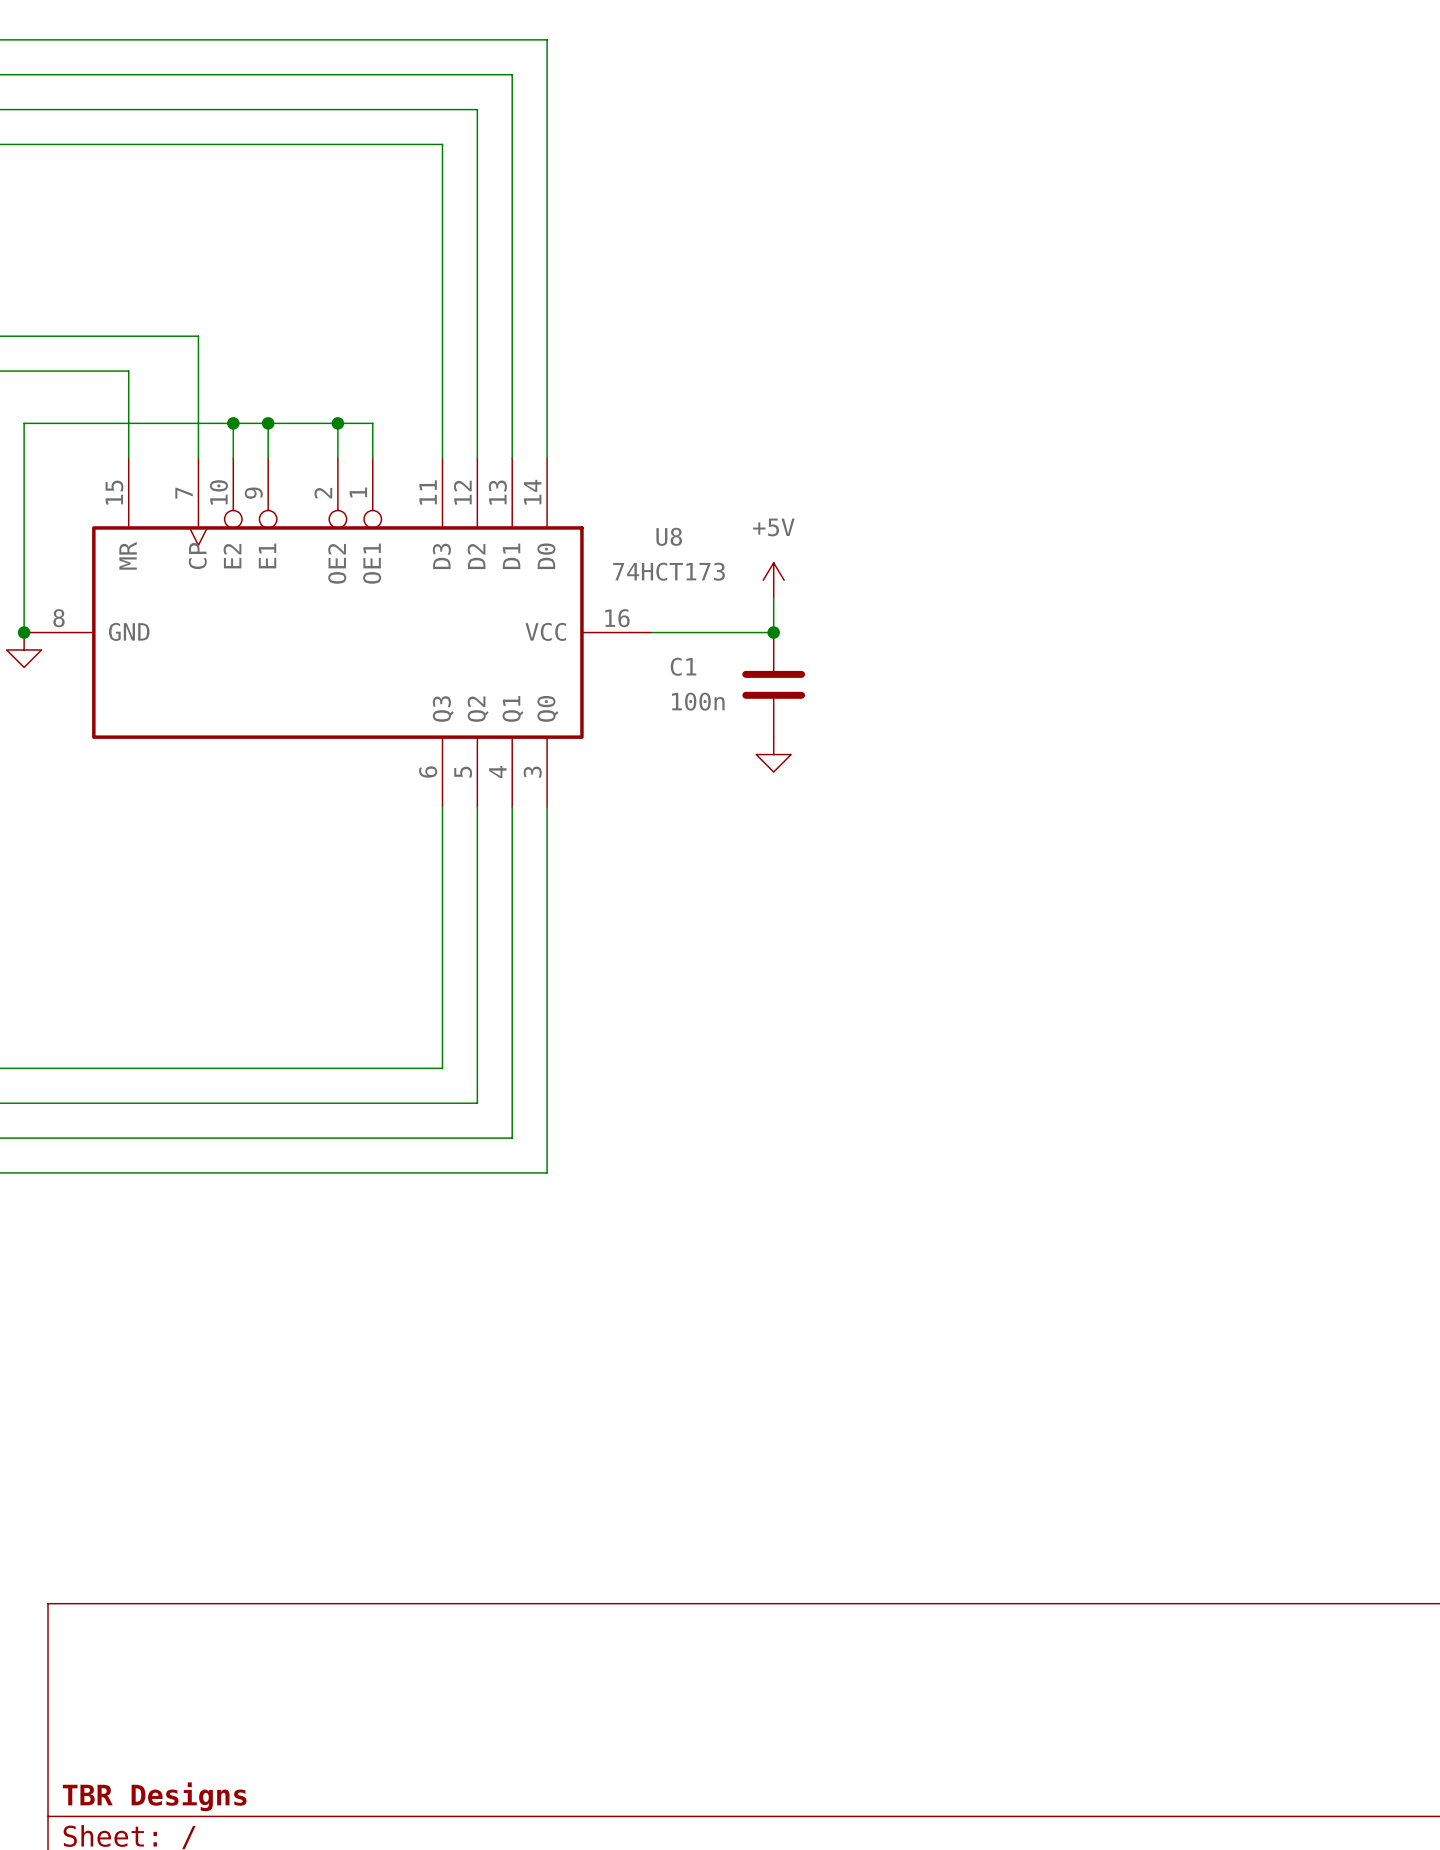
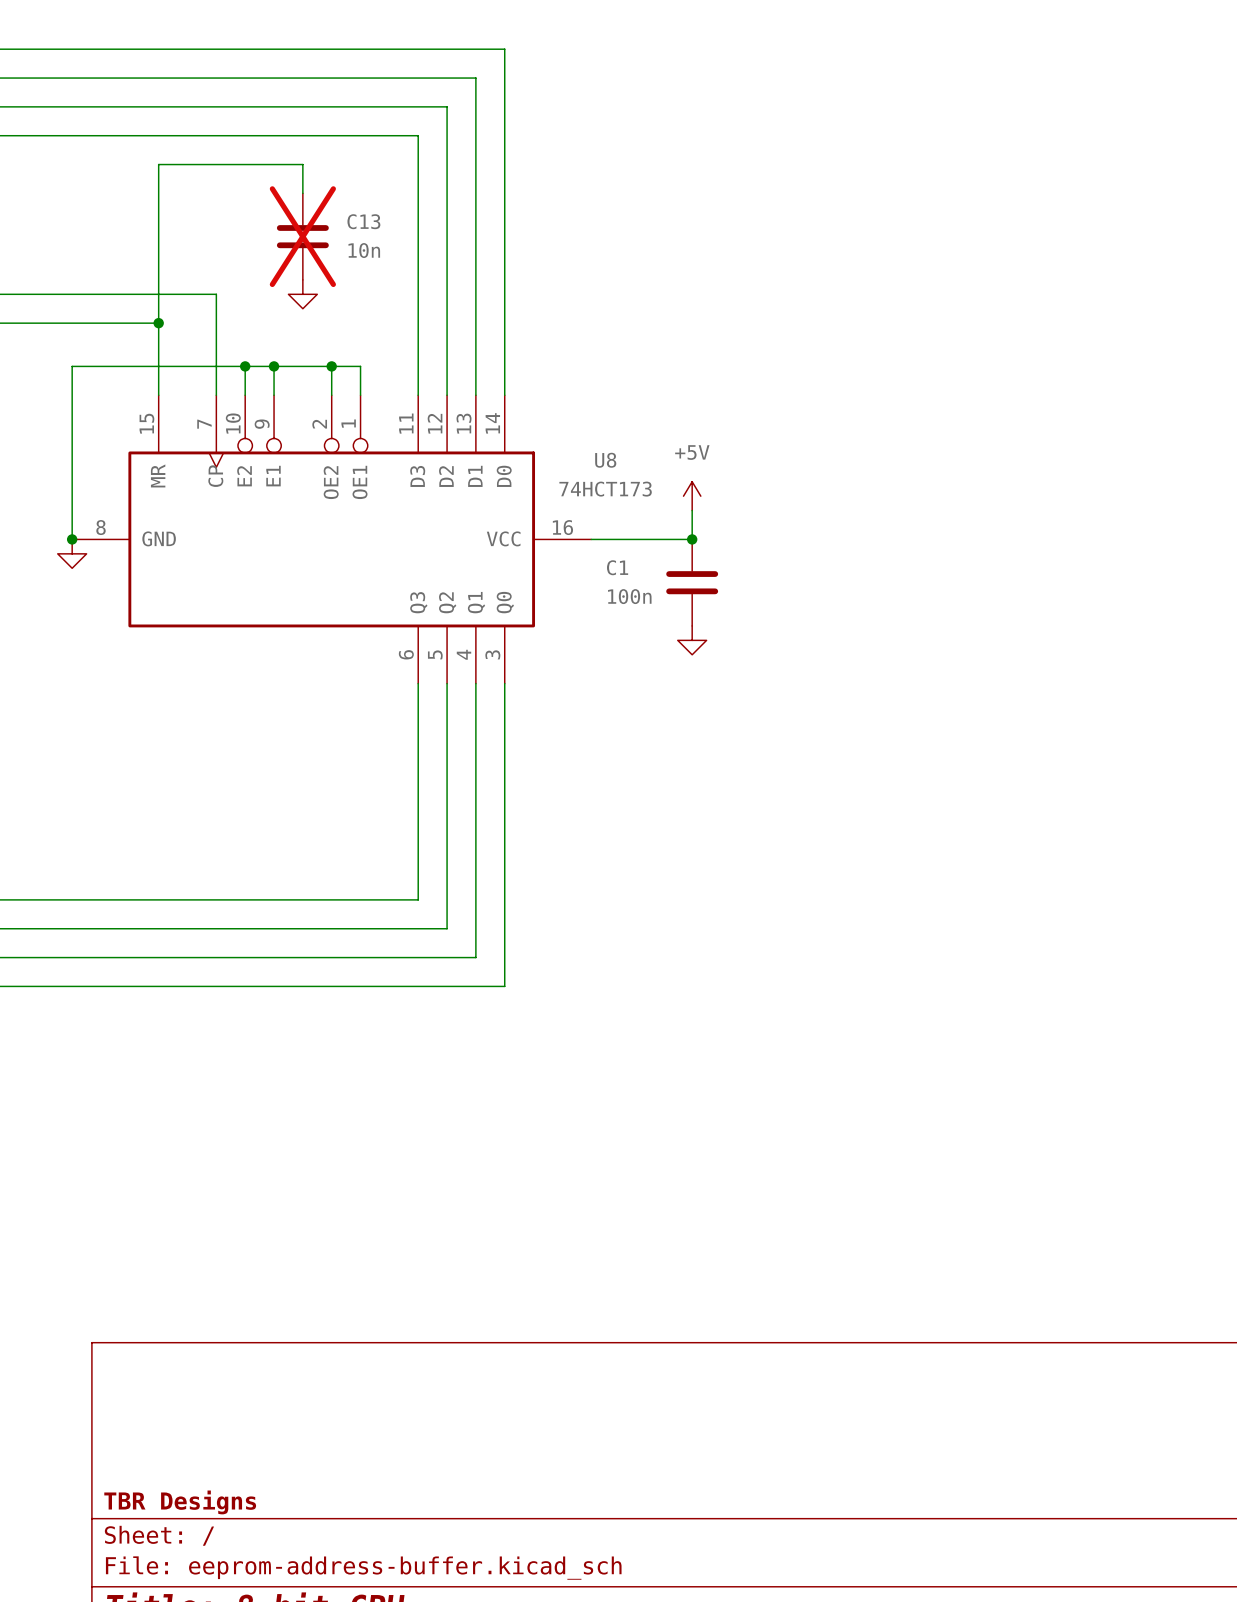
wire: none -> (302, 193) (302, 164) (158, 164) (158, 323)
C13: none -> 10n (302, 236)
power symbol: none -> (302, 294)
junction: none -> (158, 323)

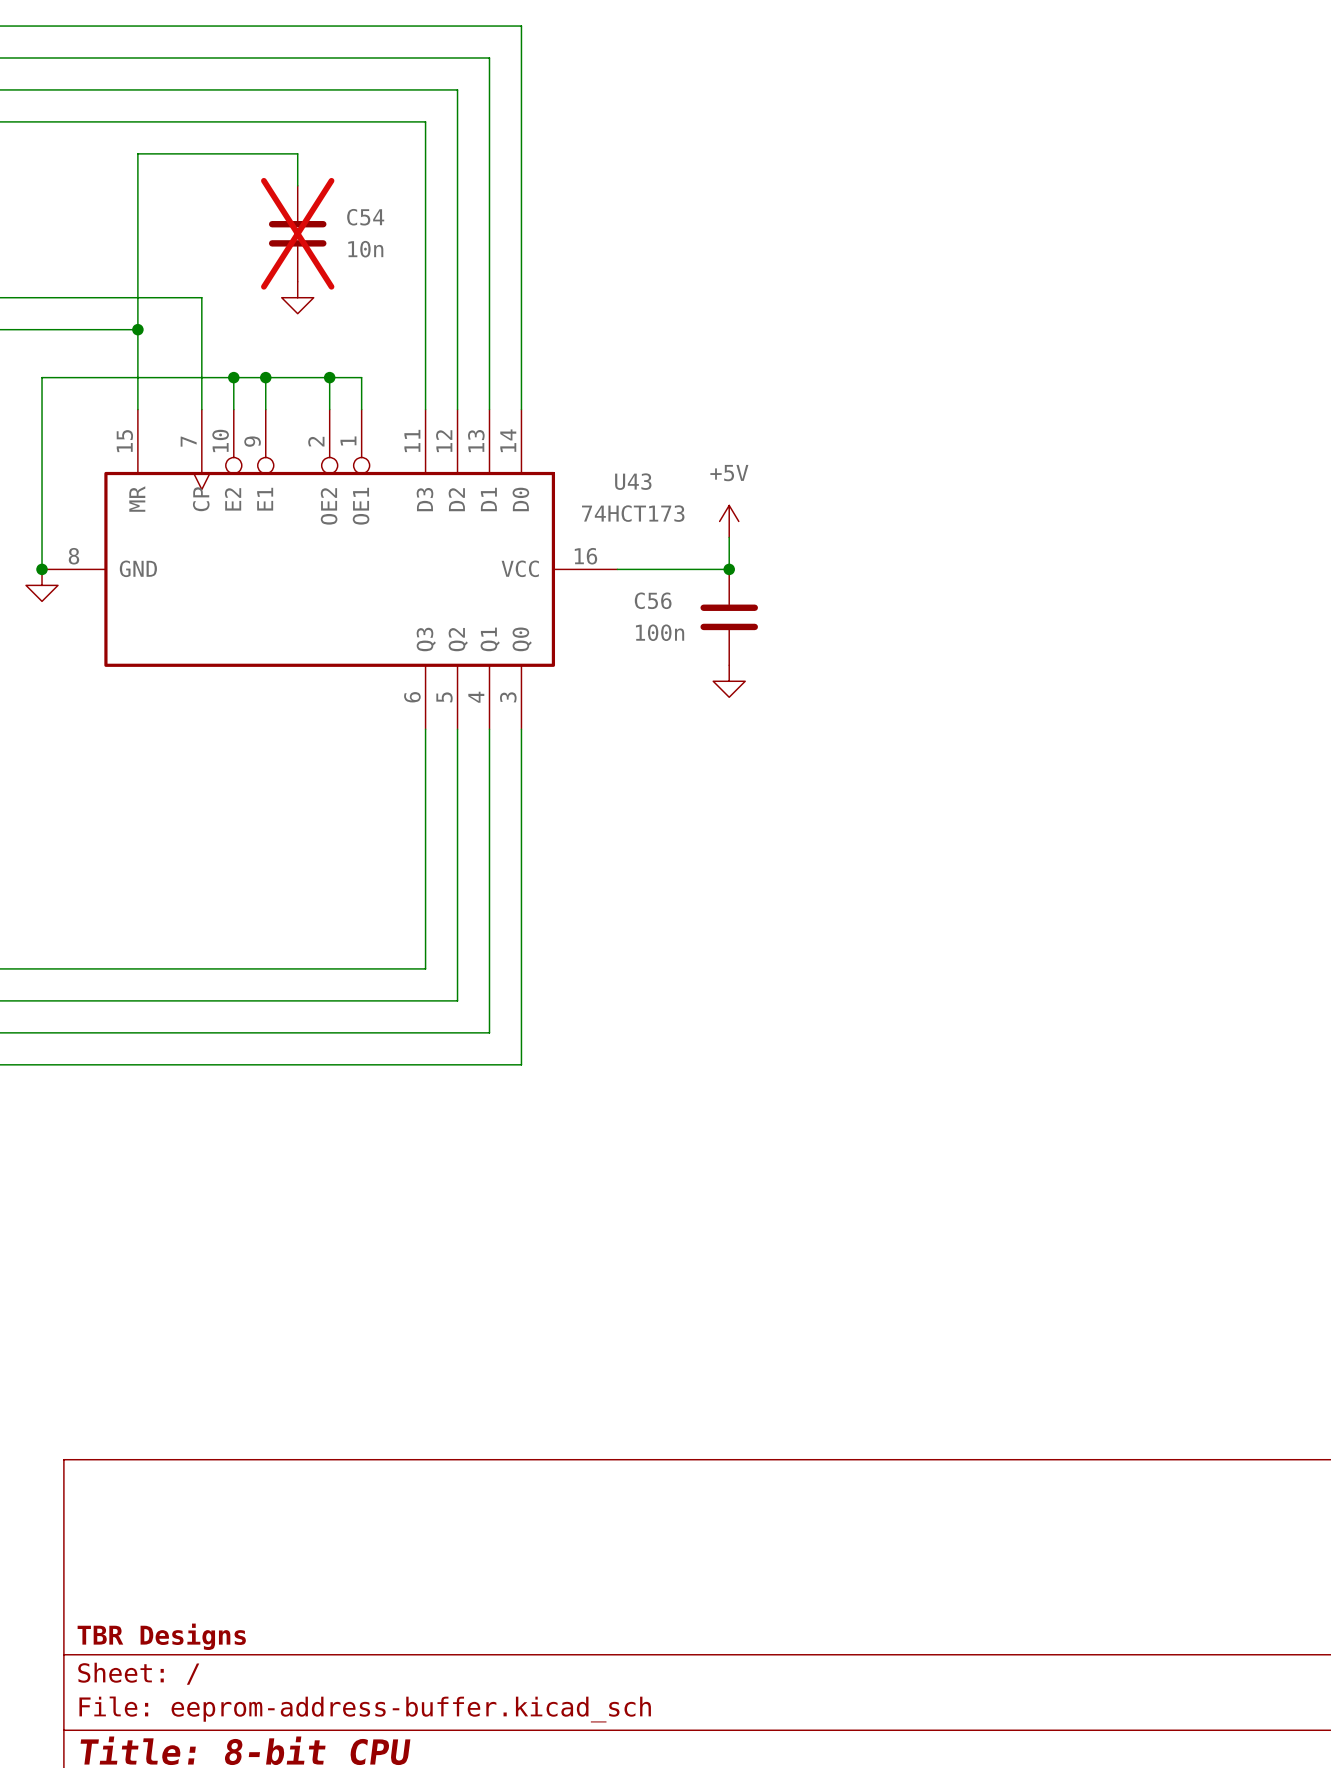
C13 name: C13 (363, 221) -> C54 (365, 217)
U8 name: U8 (605, 460) -> U43 (633, 481)
C1 name: C1 (617, 567) -> C56 (653, 600)

